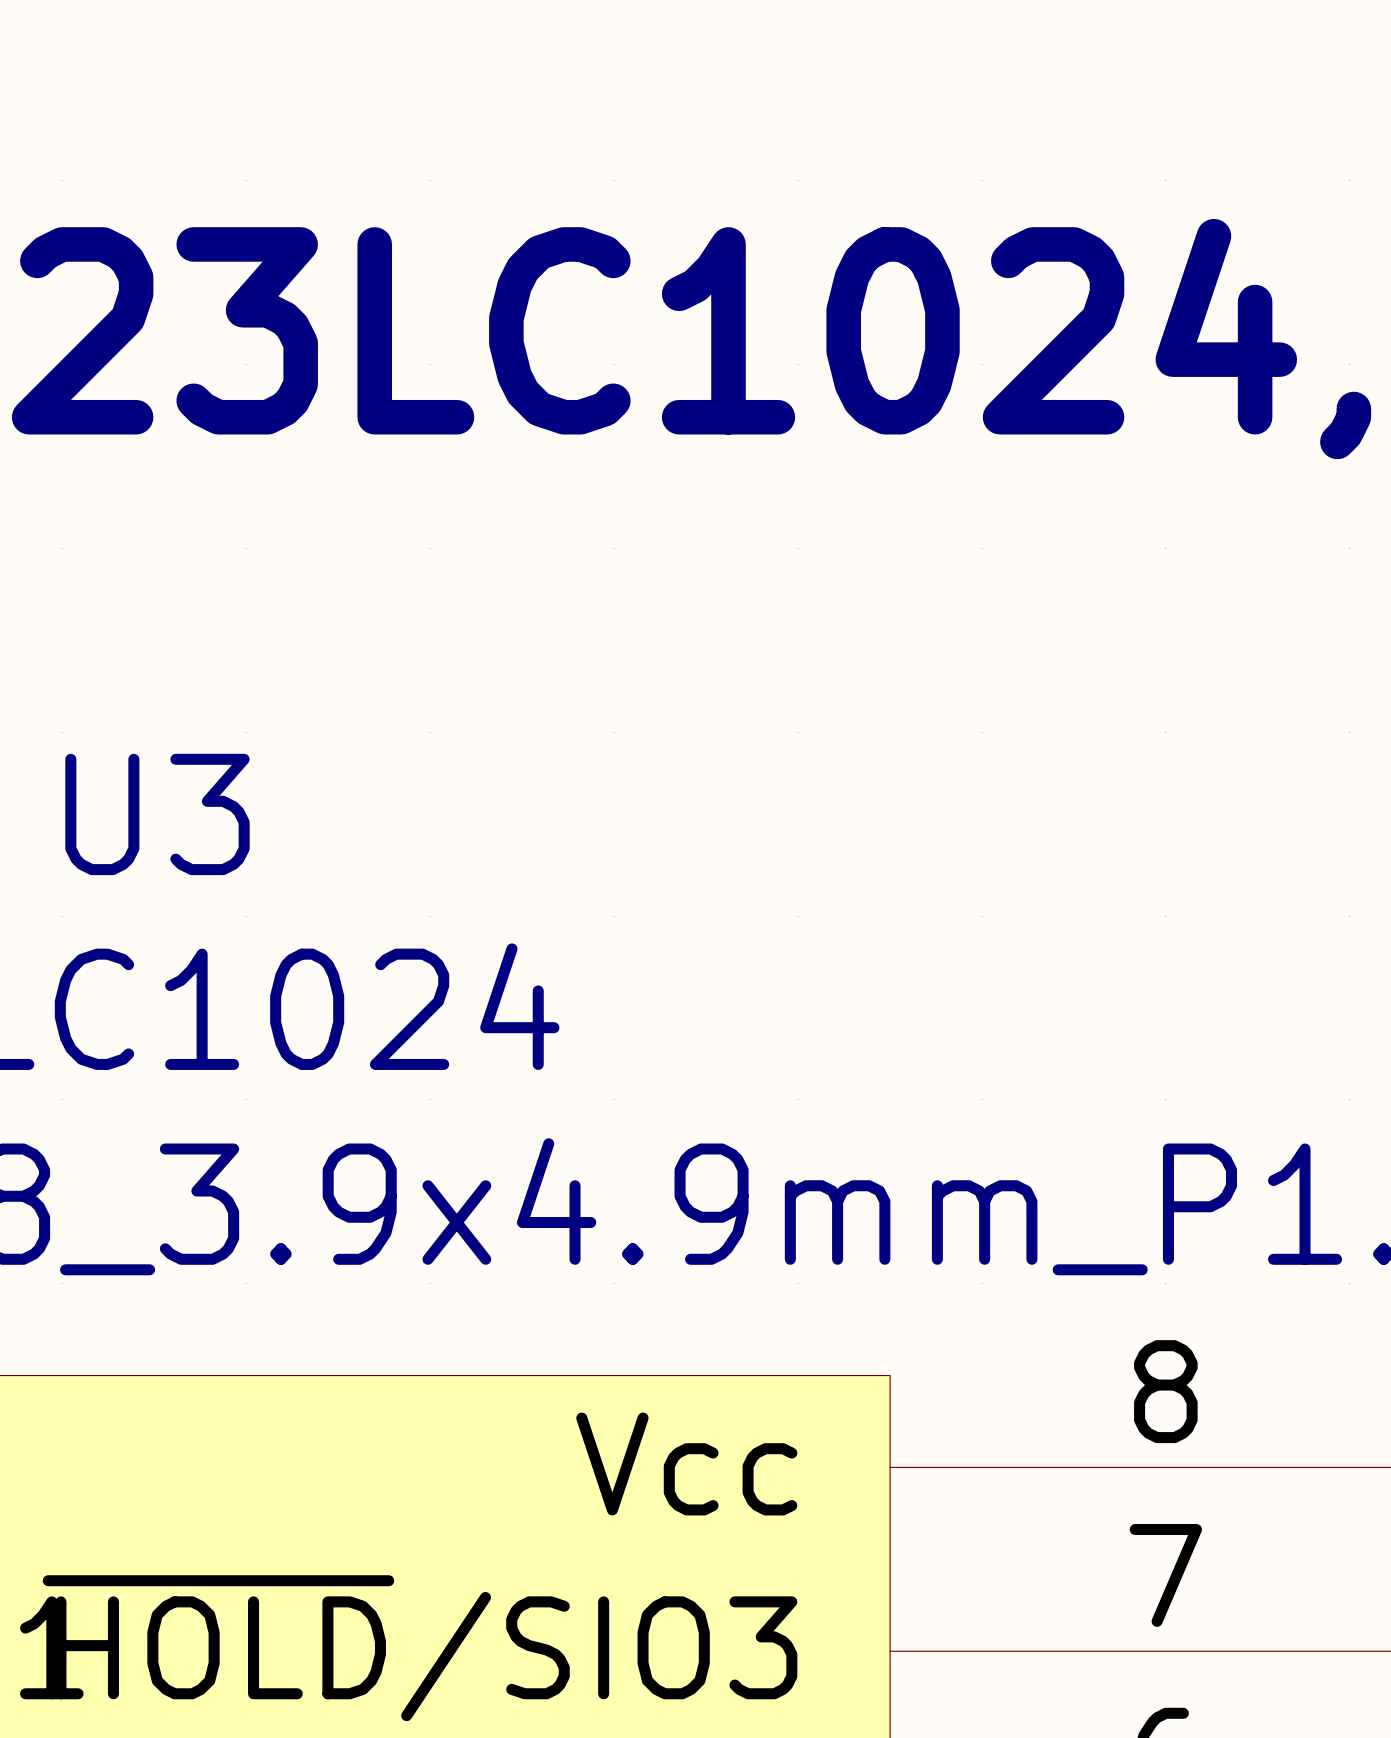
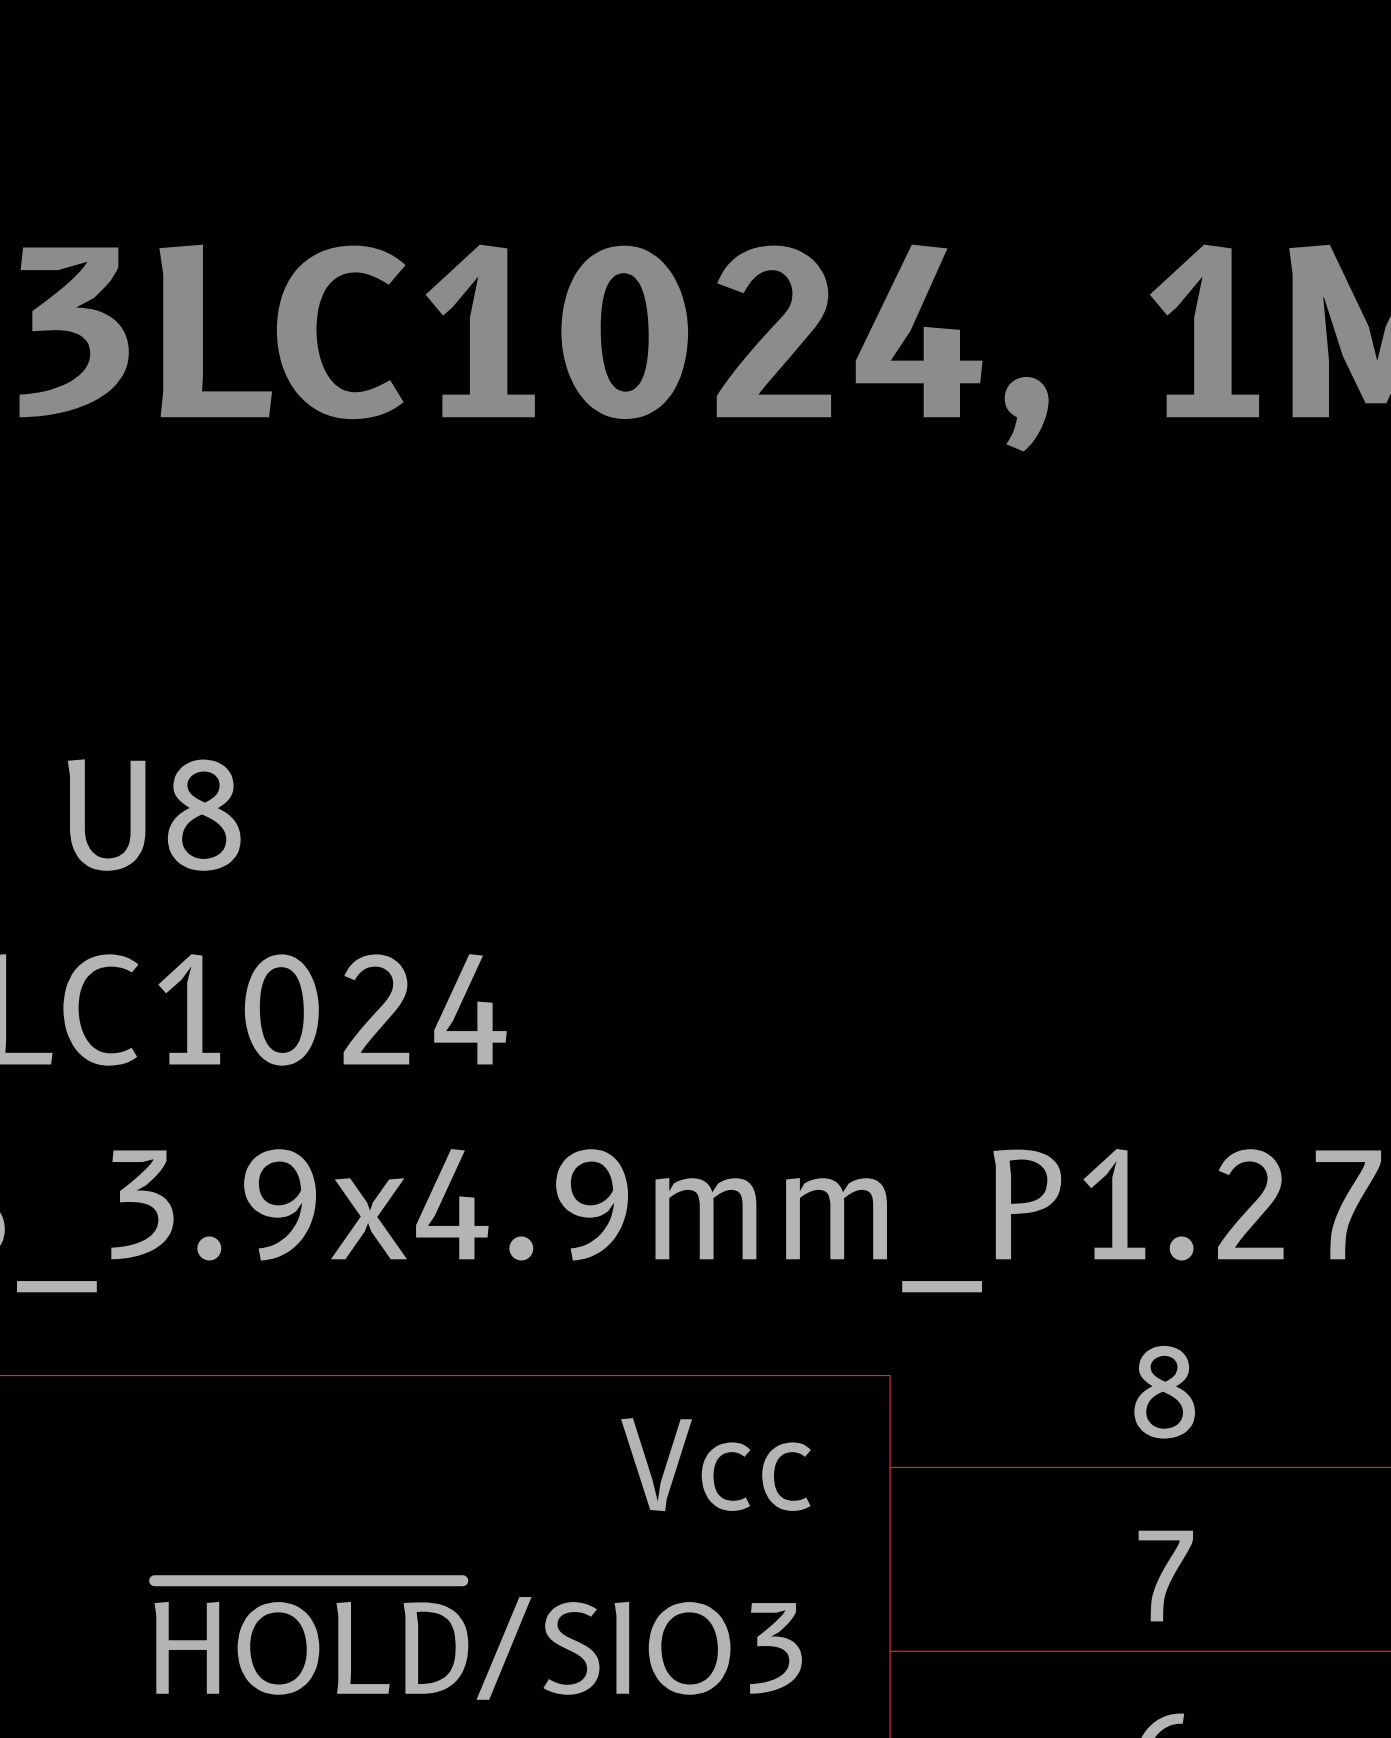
U3 name: U3 (157, 814) -> U8 (154, 815)

